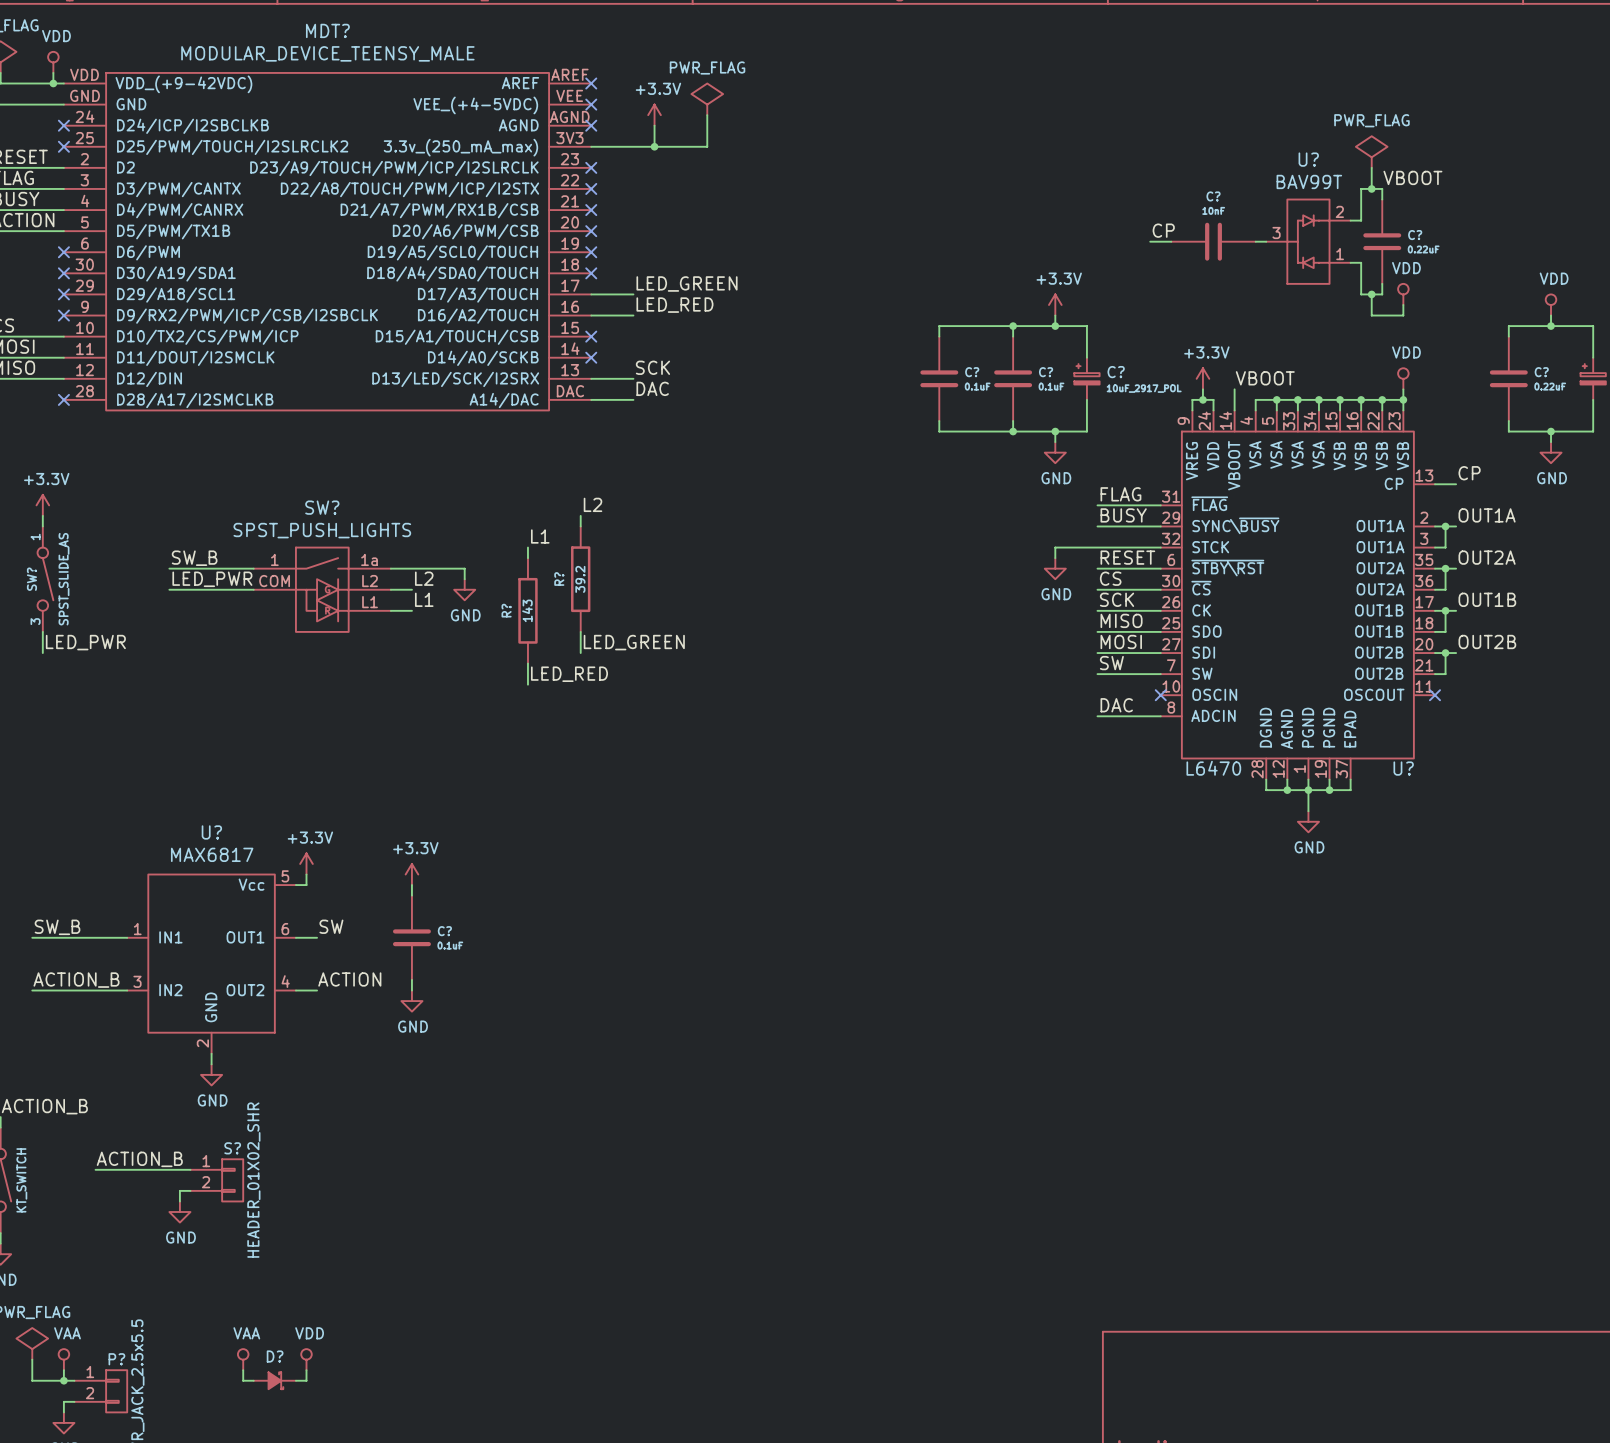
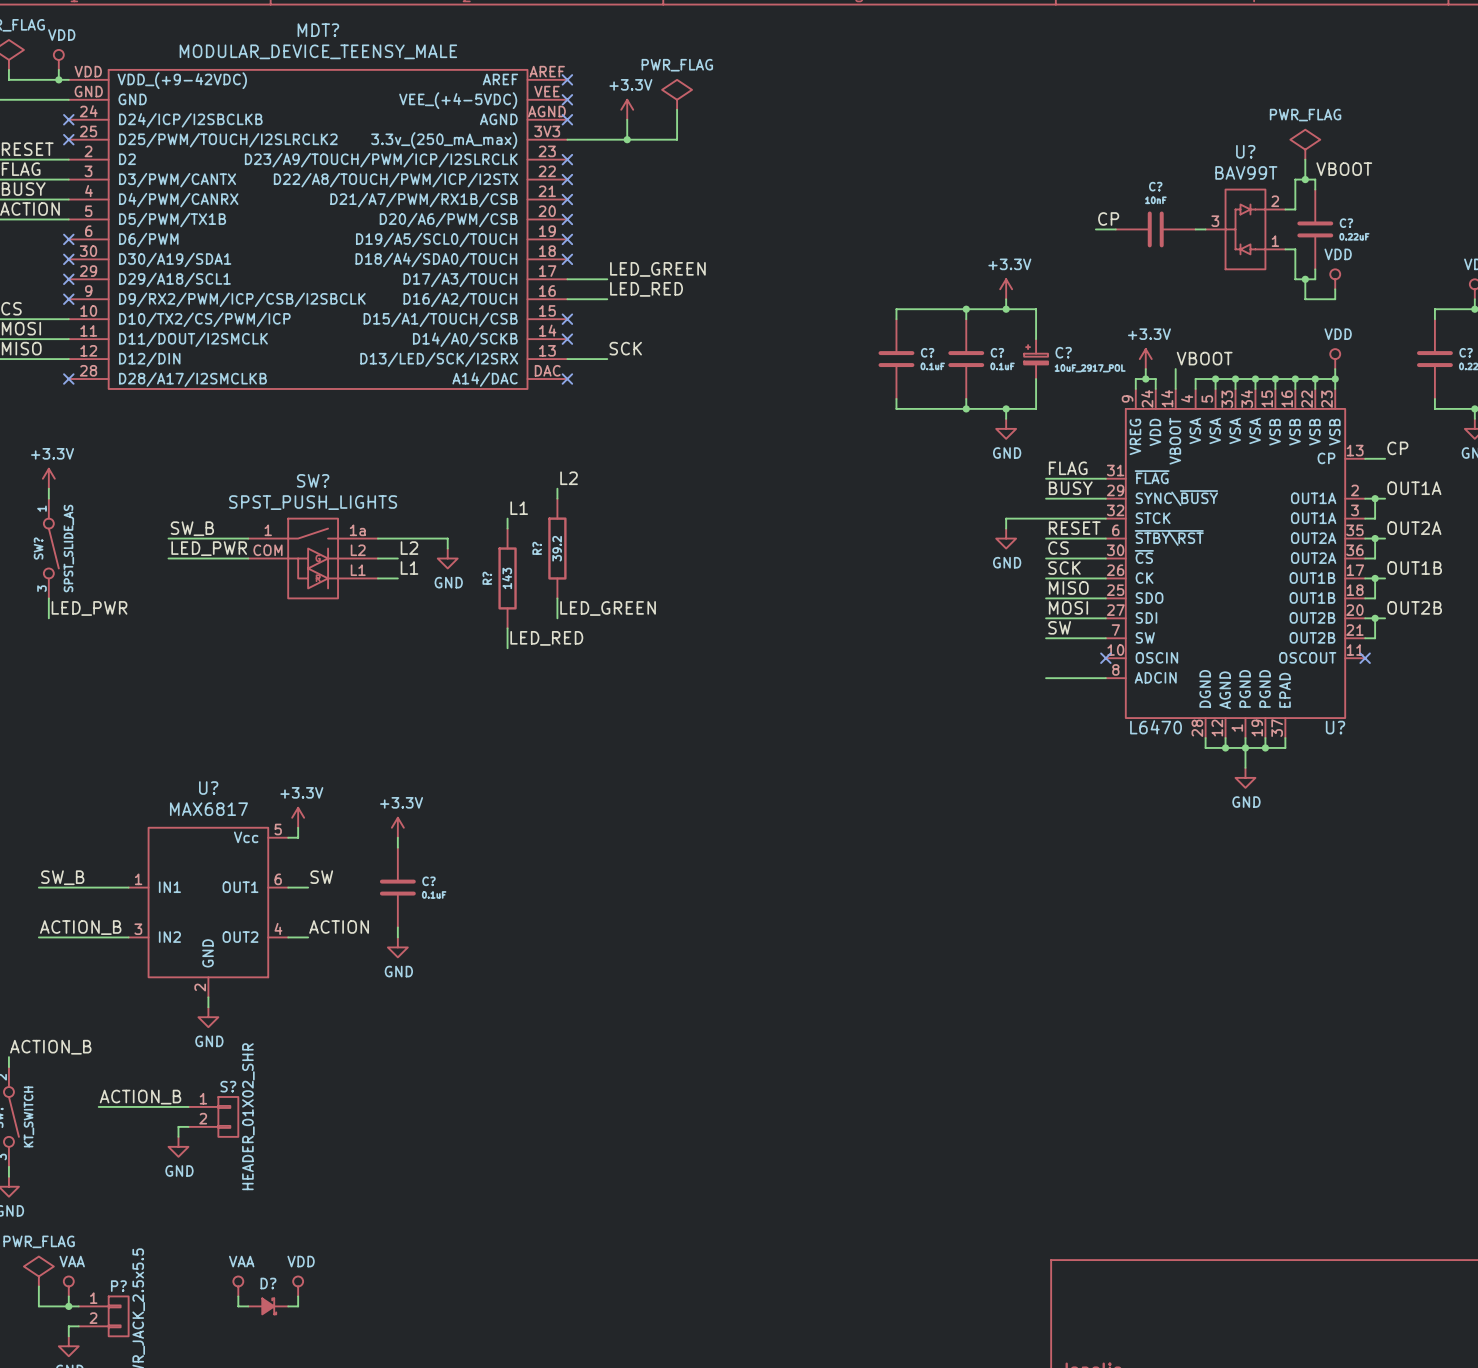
label: DAC (652, 388) -> none
wire: (591, 399) (633, 399) -> none
no-connect mark: none -> (567, 379)
label: DAC (1116, 705) -> none

